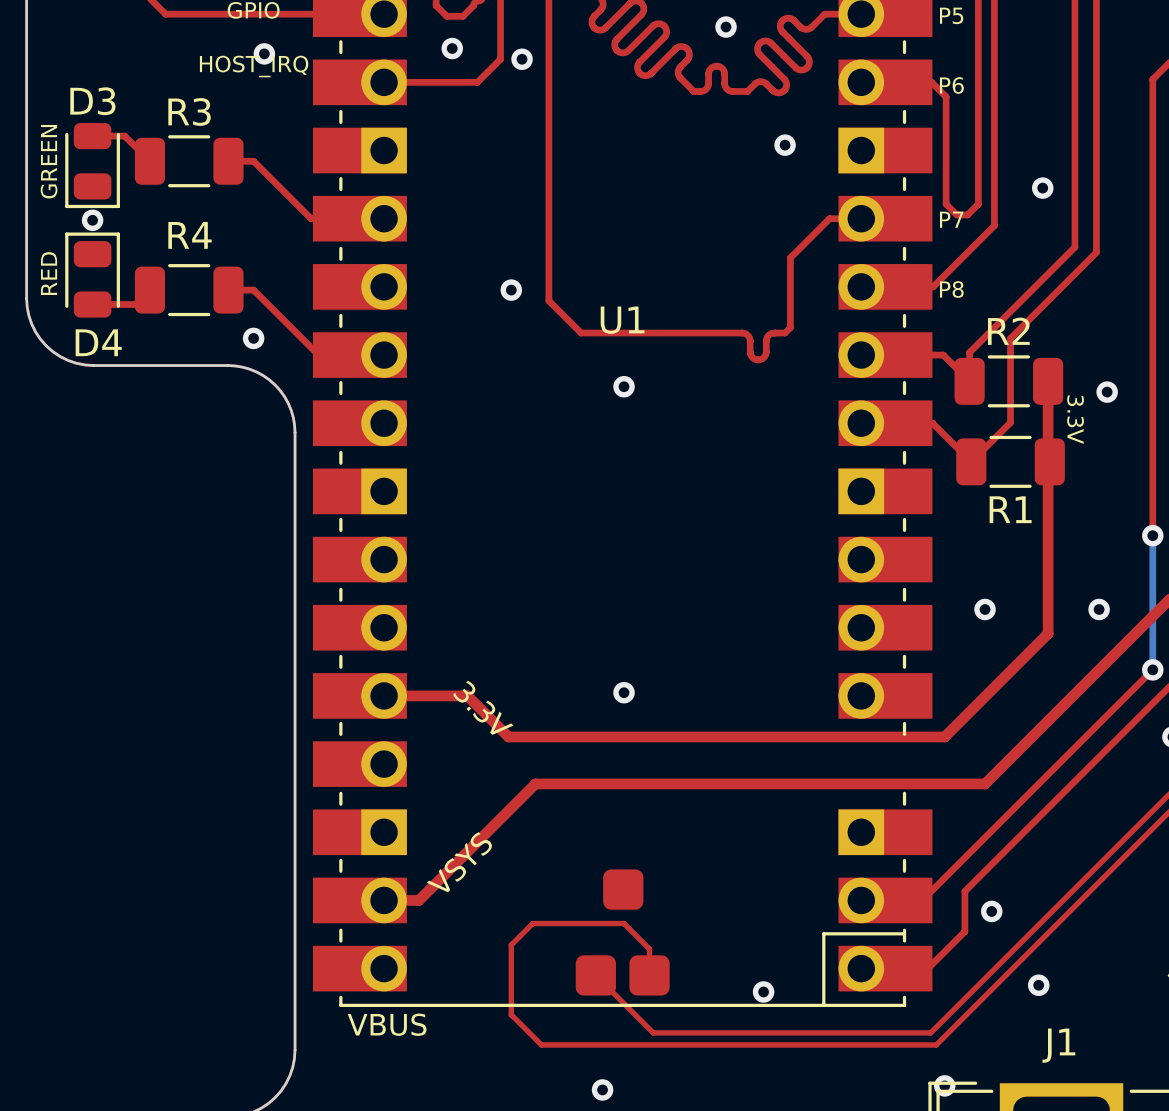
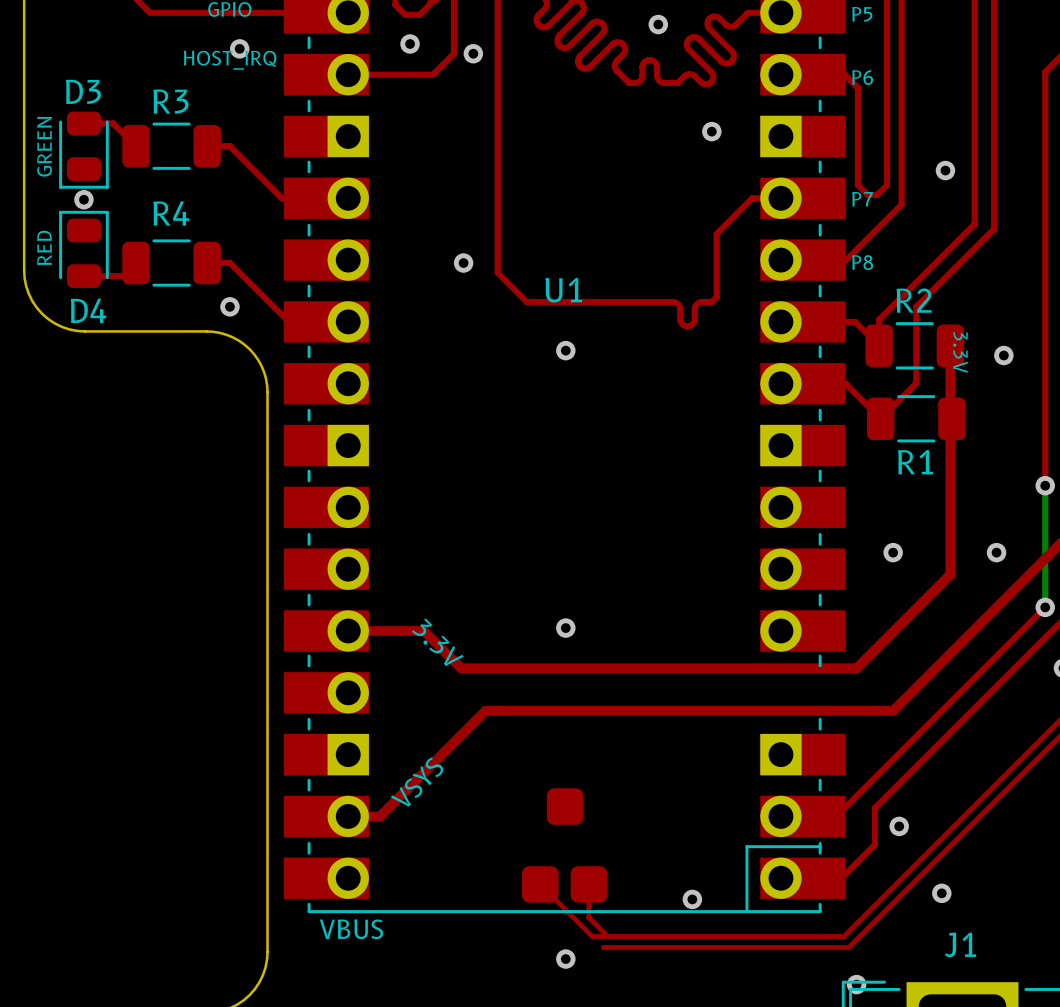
text position: 3.3V (1075, 419) -> 3.3V (960, 352)
top track: (649, 975) (649, 949) (624, 923) (532, 923) (511, 945) (511, 1014) (541, 1044) (665, 1044) -> (588, 884) (588, 917) (607, 936)
via position: (602, 1089) -> (565, 959)

